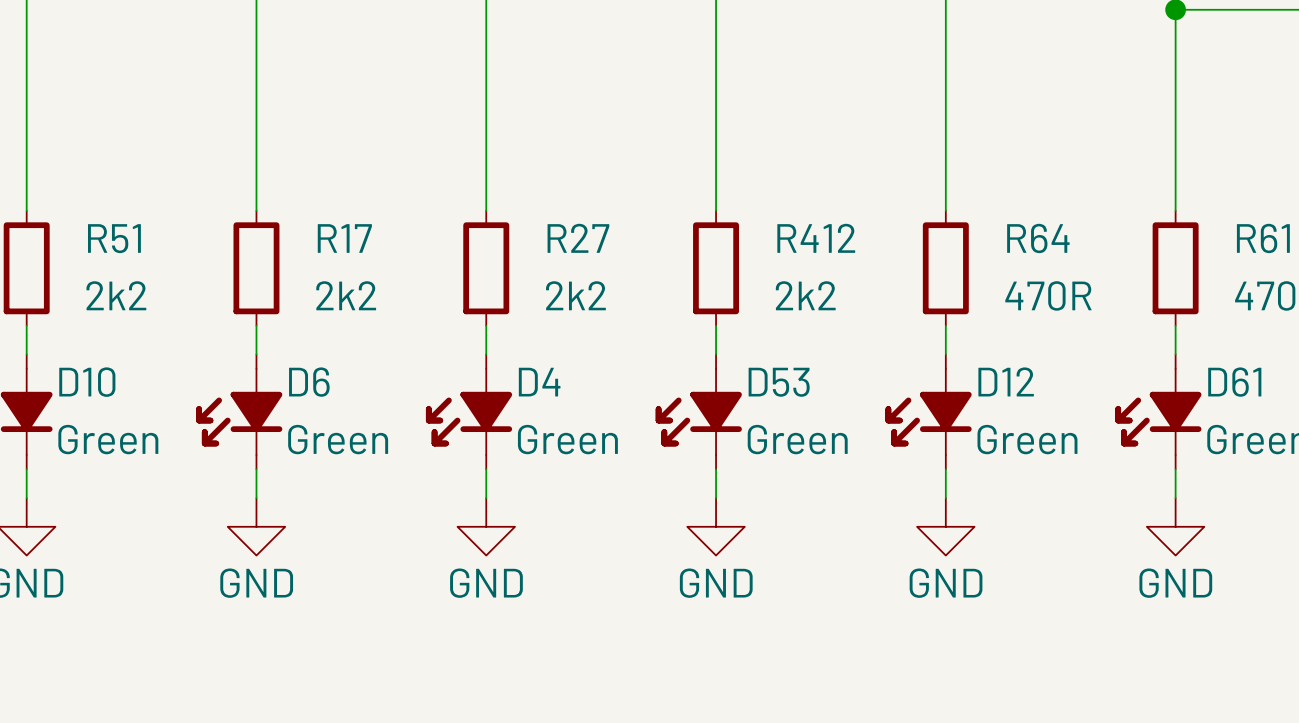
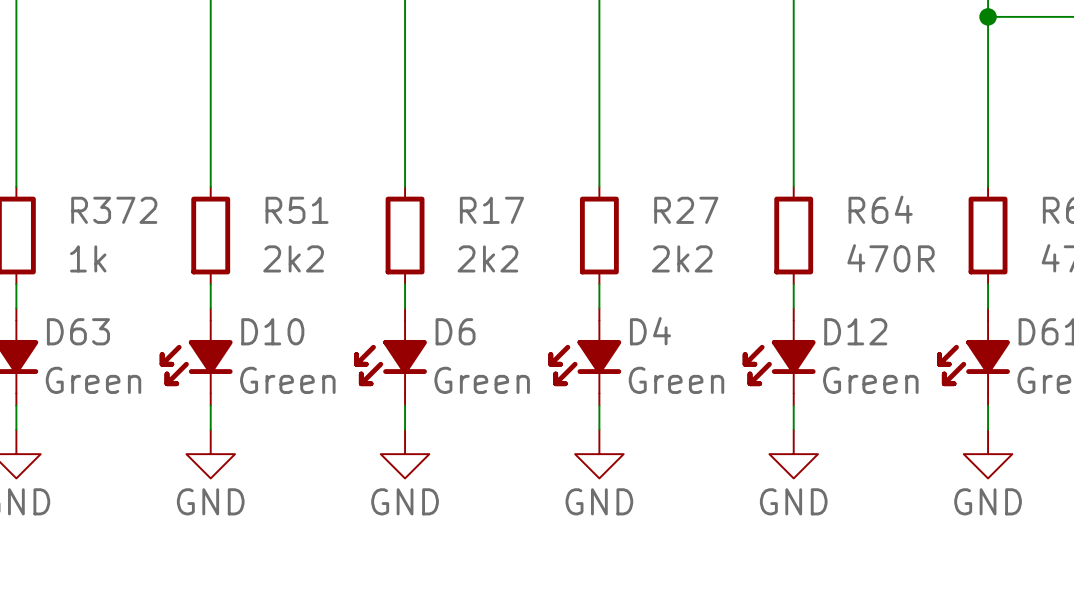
R51 name: R51 (114, 238) -> R372 (114, 210)
R17 name: R17 (344, 238) -> R51 (297, 210)
R27 name: R27 (578, 238) -> R17 (491, 210)
R412 name: R412 (816, 238) -> R27 (686, 210)
R51 text: 2k2 (116, 295) -> 1k (88, 258)
D10 name: D10 (87, 382) -> D63 (78, 331)
D6 name: D6 (309, 382) -> D10 (272, 331)
D4 name: D4 (539, 382) -> D6 (455, 331)
D53 name: D53 (779, 382) -> D4 (650, 331)

